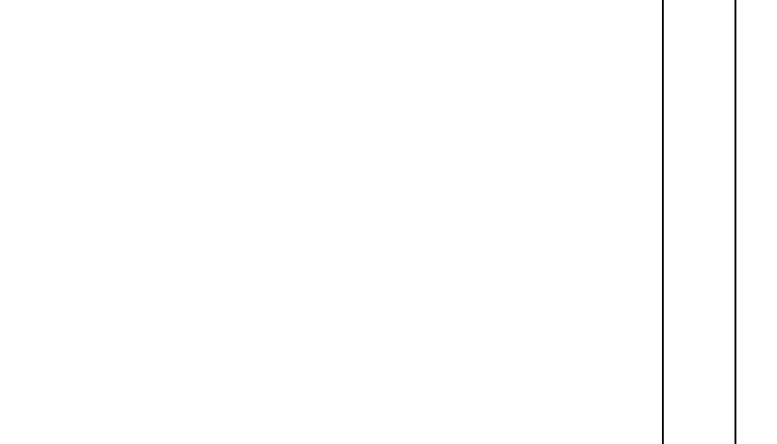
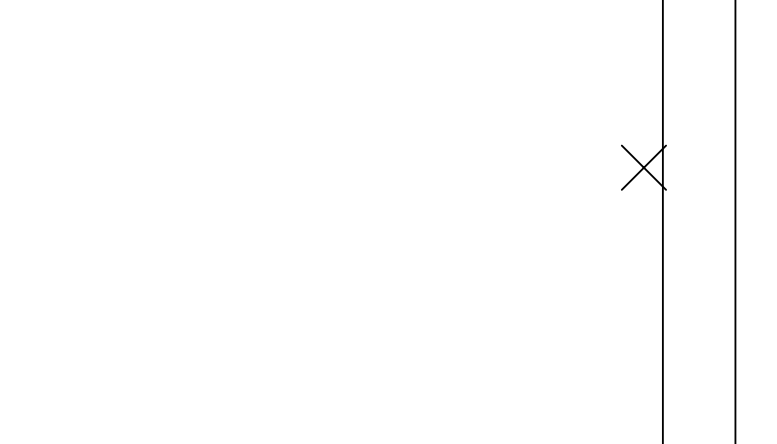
no-connect mark: none -> (643, 167)

